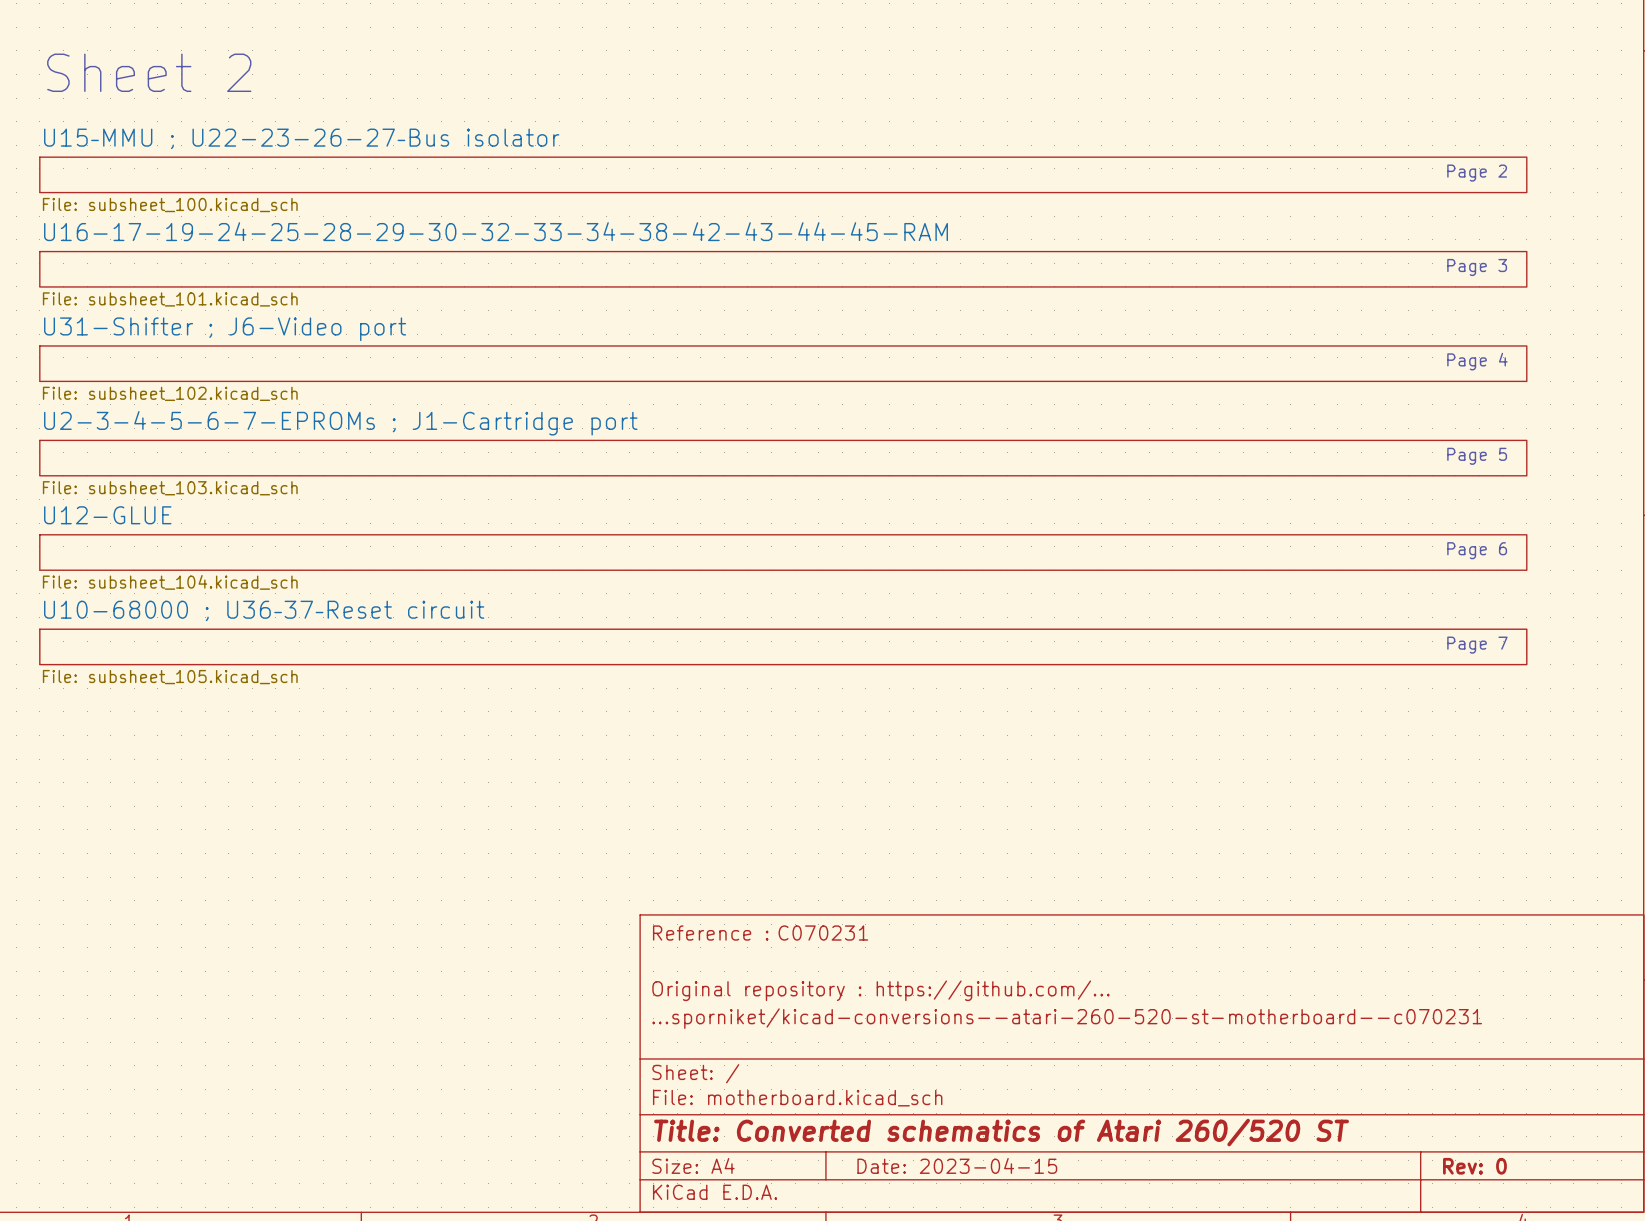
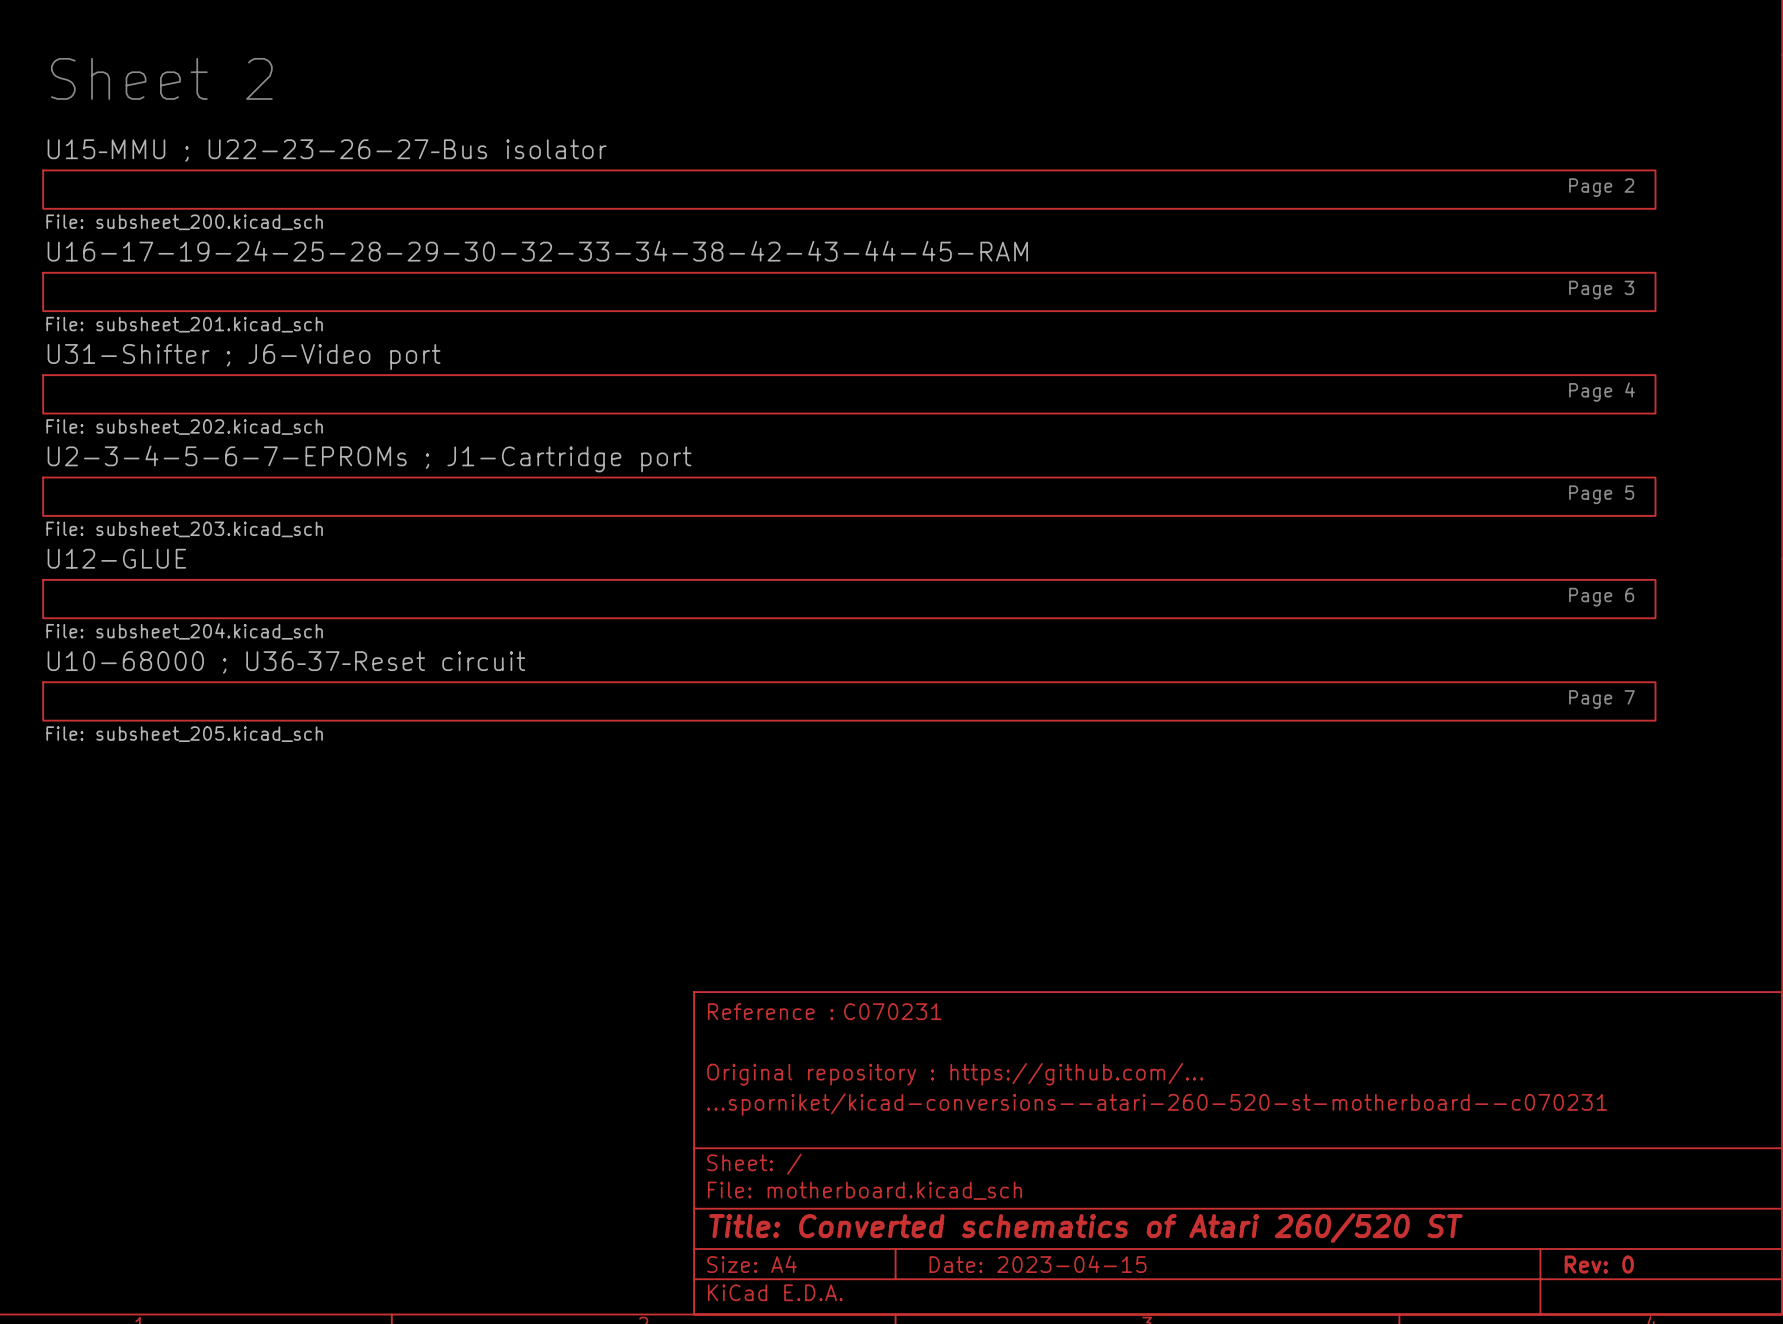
sheet U15–MMU ; U22-23-26-27–Bus isolator value: File: subsheet_100.kicad_sch (170, 205) -> File: subsheet_200.kicad_sch (184, 222)
sheet U16-17-19-24-25-28-29-30-32-33-34-38-42-43-44-45-RAM value: File: subsheet_101.kicad_sch (170, 299) -> File: subsheet_201.kicad_sch (184, 324)
sheet U31-Shifter ; J6-Video port value: File: subsheet_102.kicad_sch (170, 393) -> File: subsheet_202.kicad_sch (184, 427)
sheet U2-3-4-5-6-7-EPROMs ; J1-Cartridge port value: File: subsheet_103.kicad_sch (170, 488) -> File: subsheet_203.kicad_sch (184, 529)
sheet U12-GLUE value: File: subsheet_104.kicad_sch (170, 582) -> File: subsheet_204.kicad_sch (184, 631)
sheet U10-68000 ; U36–37–Reset circuit value: File: subsheet_105.kicad_sch (170, 677) -> File: subsheet_205.kicad_sch (184, 734)

